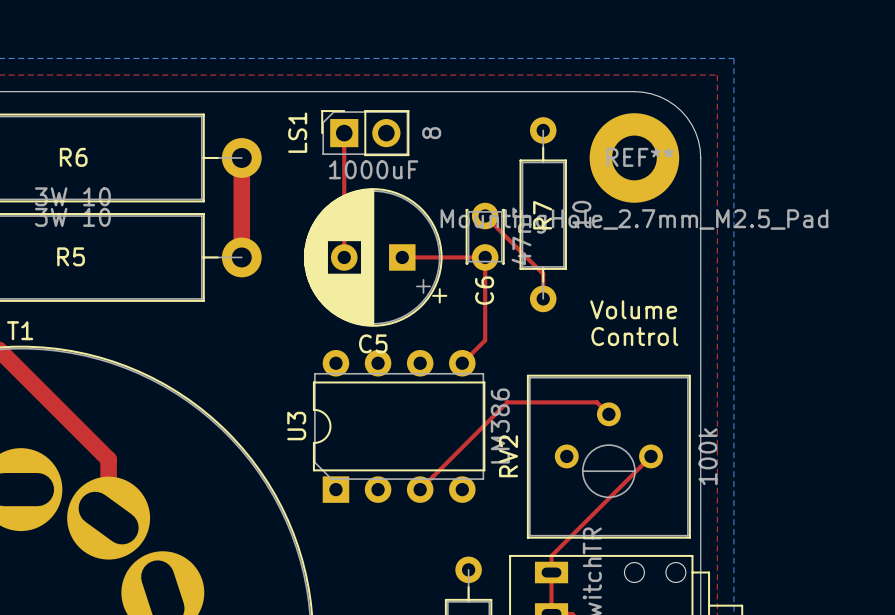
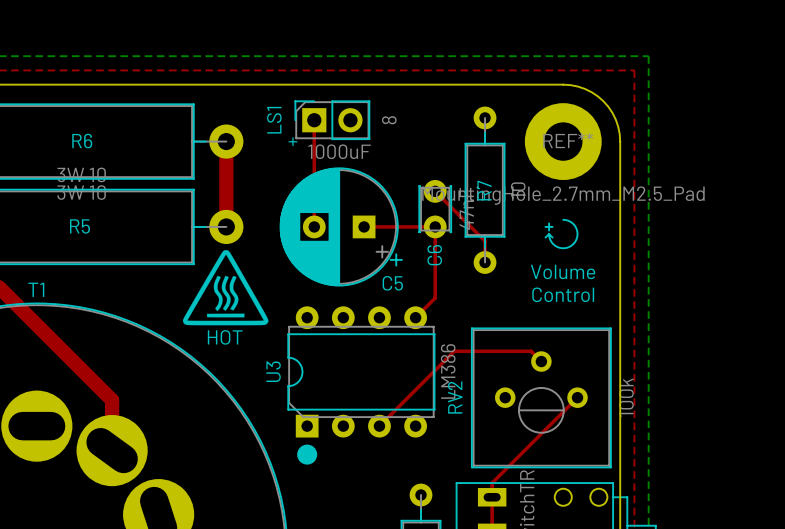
text: none -> + (292, 141)
line: none -> (563, 219) (570, 221) (576, 228) (577, 235) (573, 244) (565, 248) (557, 247) (552, 242) (549, 234)
line: none -> (549, 223) (549, 230)
line: none -> (545, 226) (552, 226)
line: none -> (549, 234) (552, 237)
line: none -> (549, 234) (545, 237)
drawing: none -> [182, 250, 269, 326]
C5 name position: C5 (373, 343) -> C5 (392, 283)
text: none -> HOT (225, 337)
drawing: none -> [297, 444, 318, 465]

